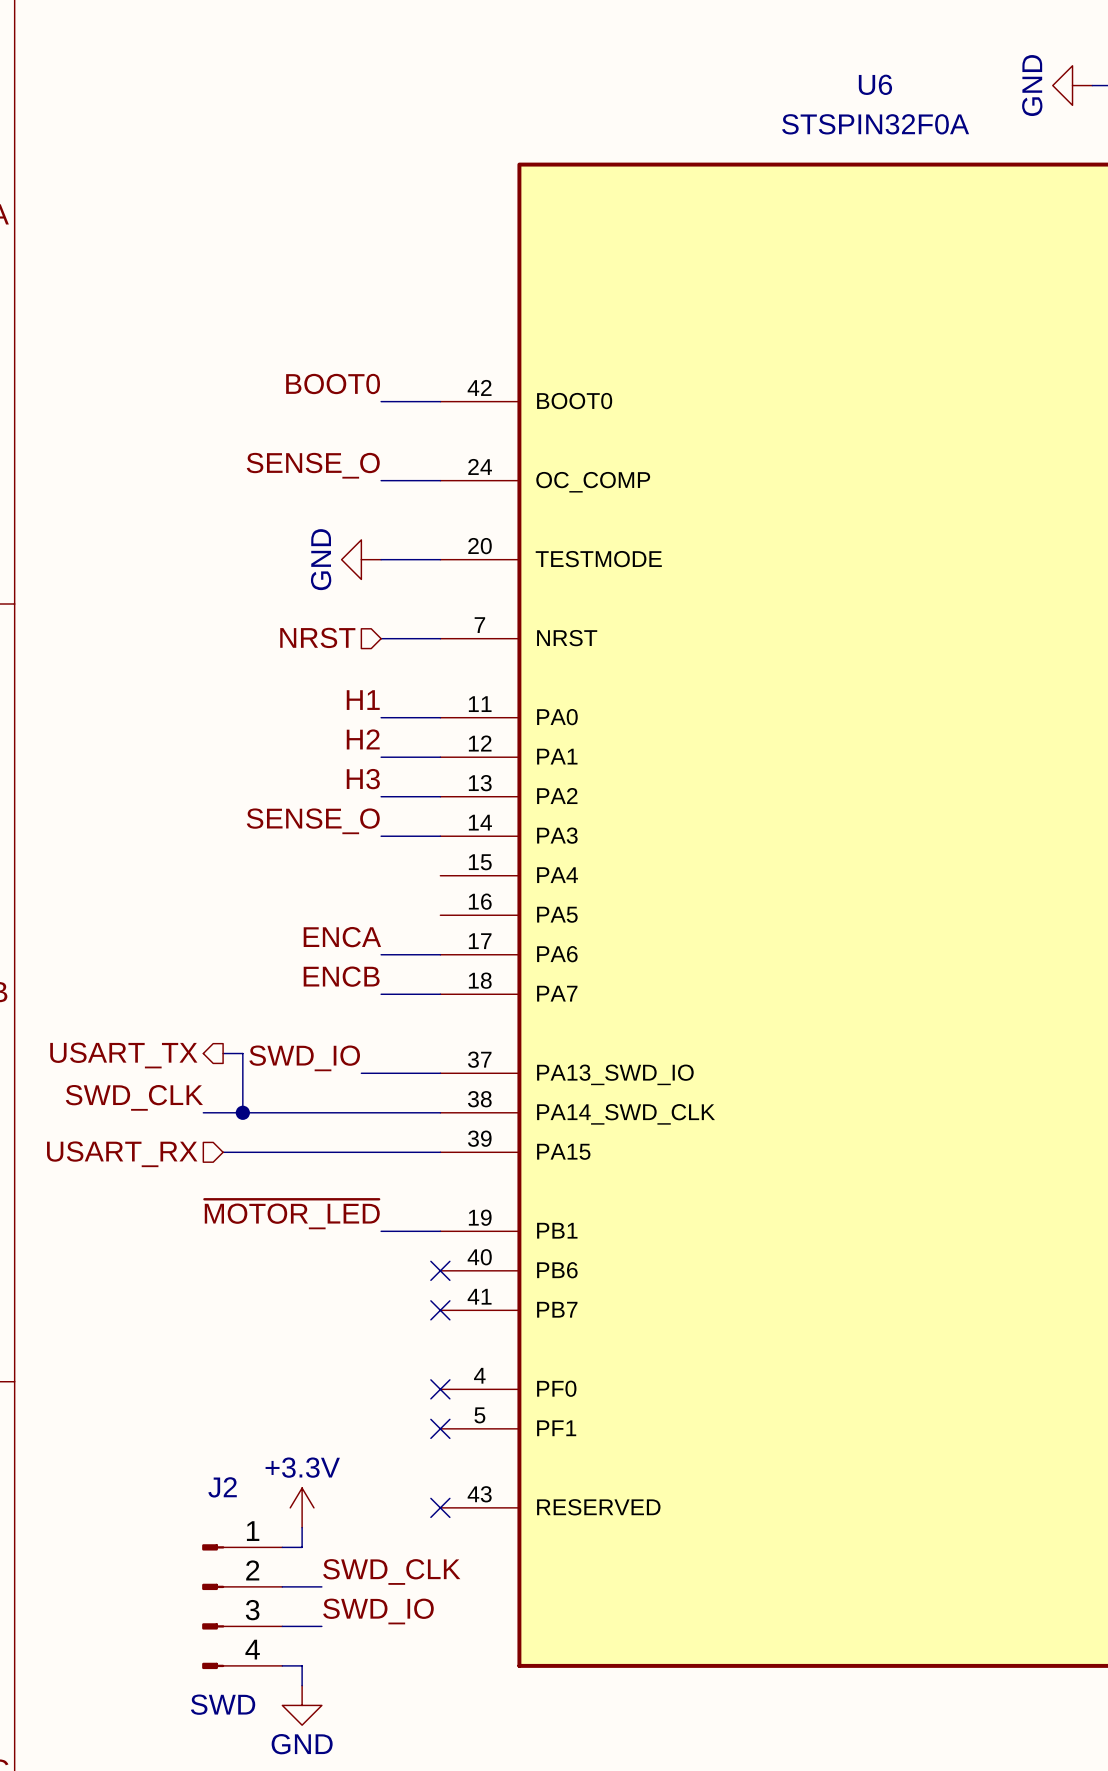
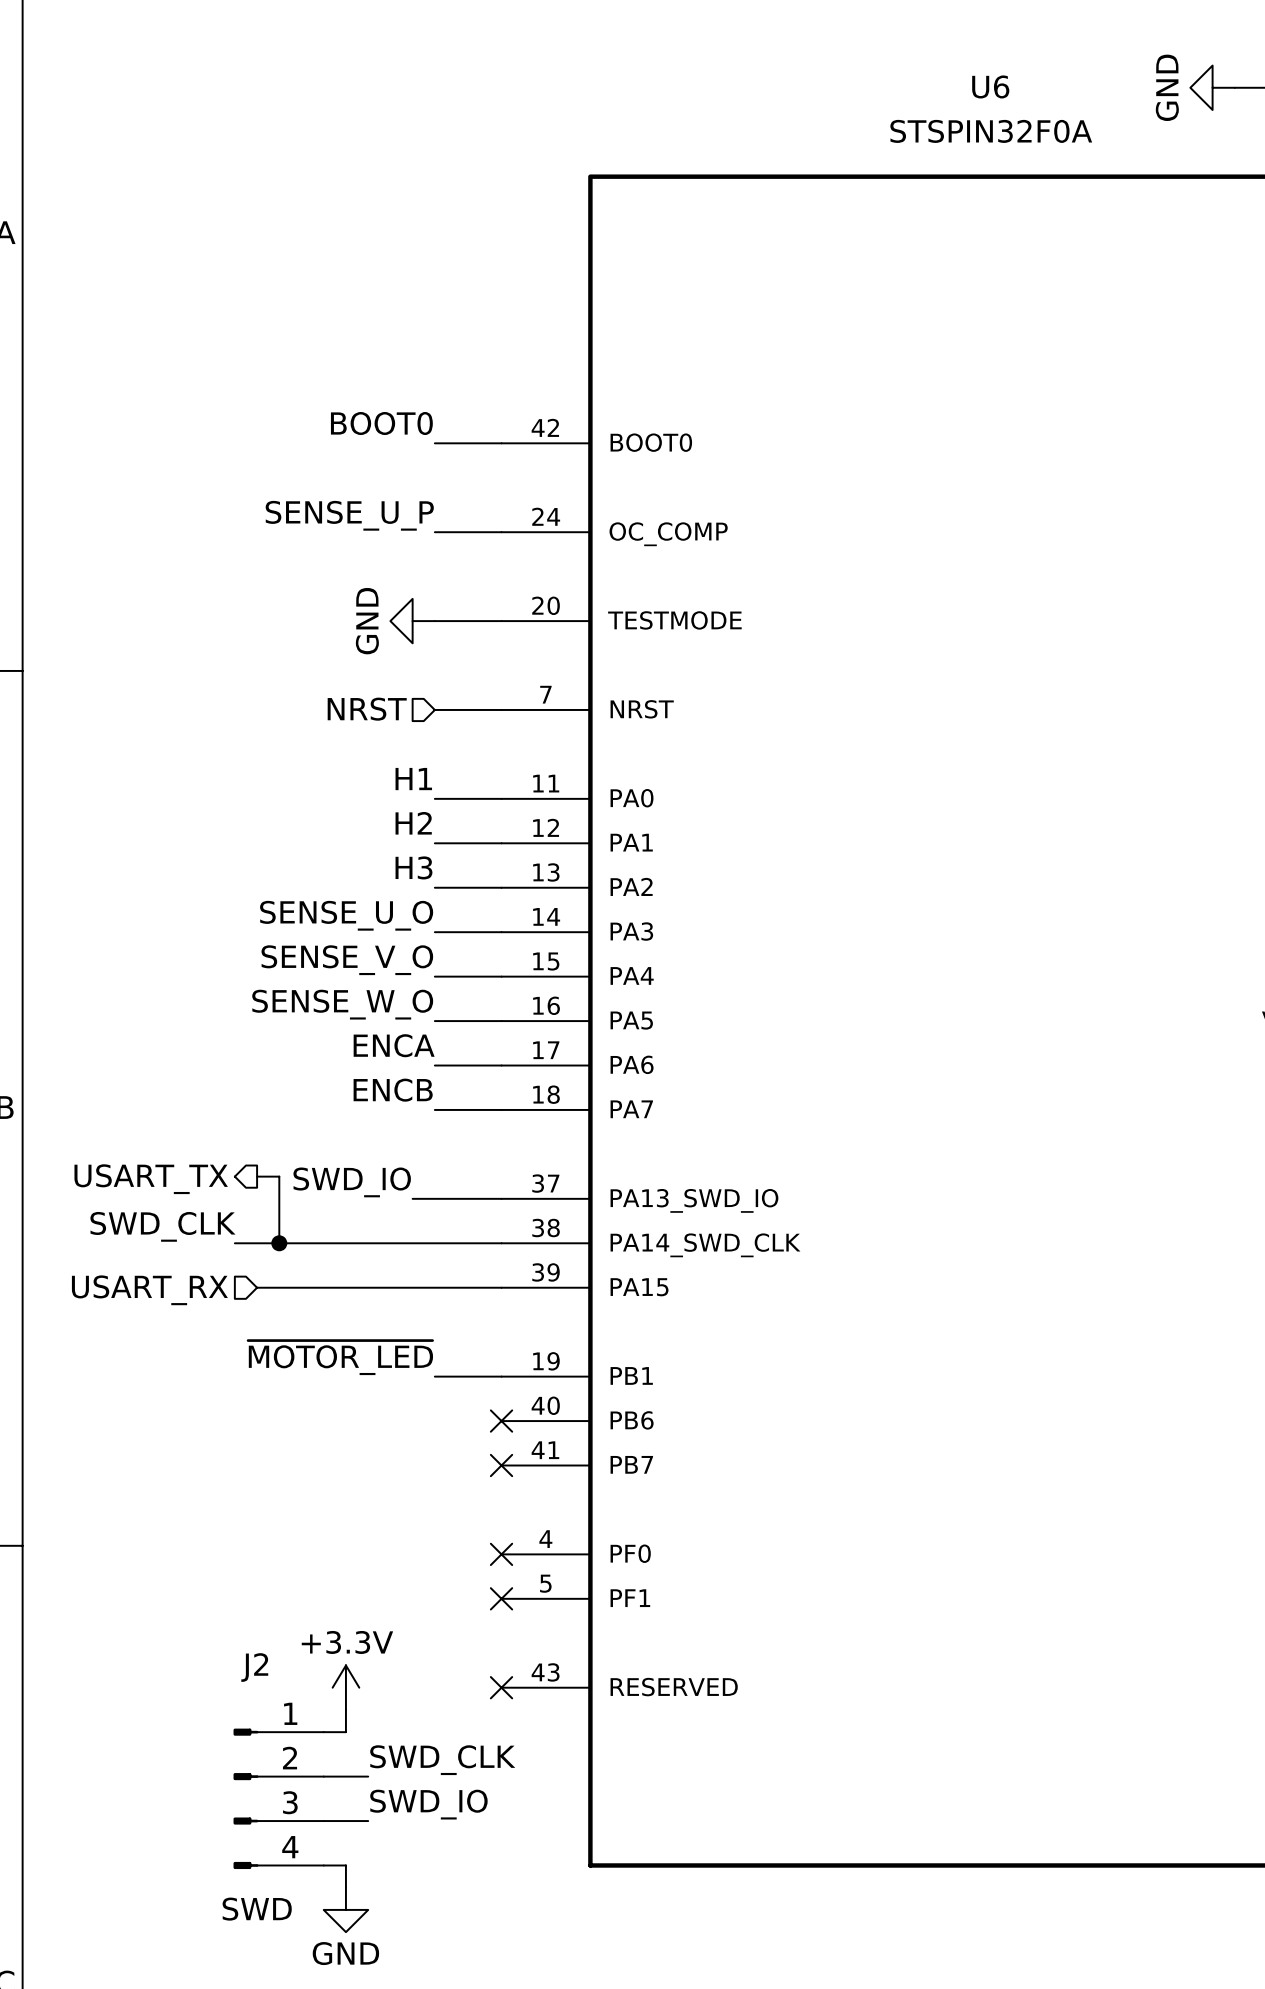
label: SENSE_O (313, 465) -> SENSE_U_P (349, 515)
label: SENSE_O (313, 821) -> SENSE_U_O (346, 915)
label: none -> SENSE_V_O (347, 960)
wire: none -> (434, 976) (501, 976)
label: none -> SENSE_W_O (342, 1004)
wire: none -> (434, 1021) (501, 1021)

